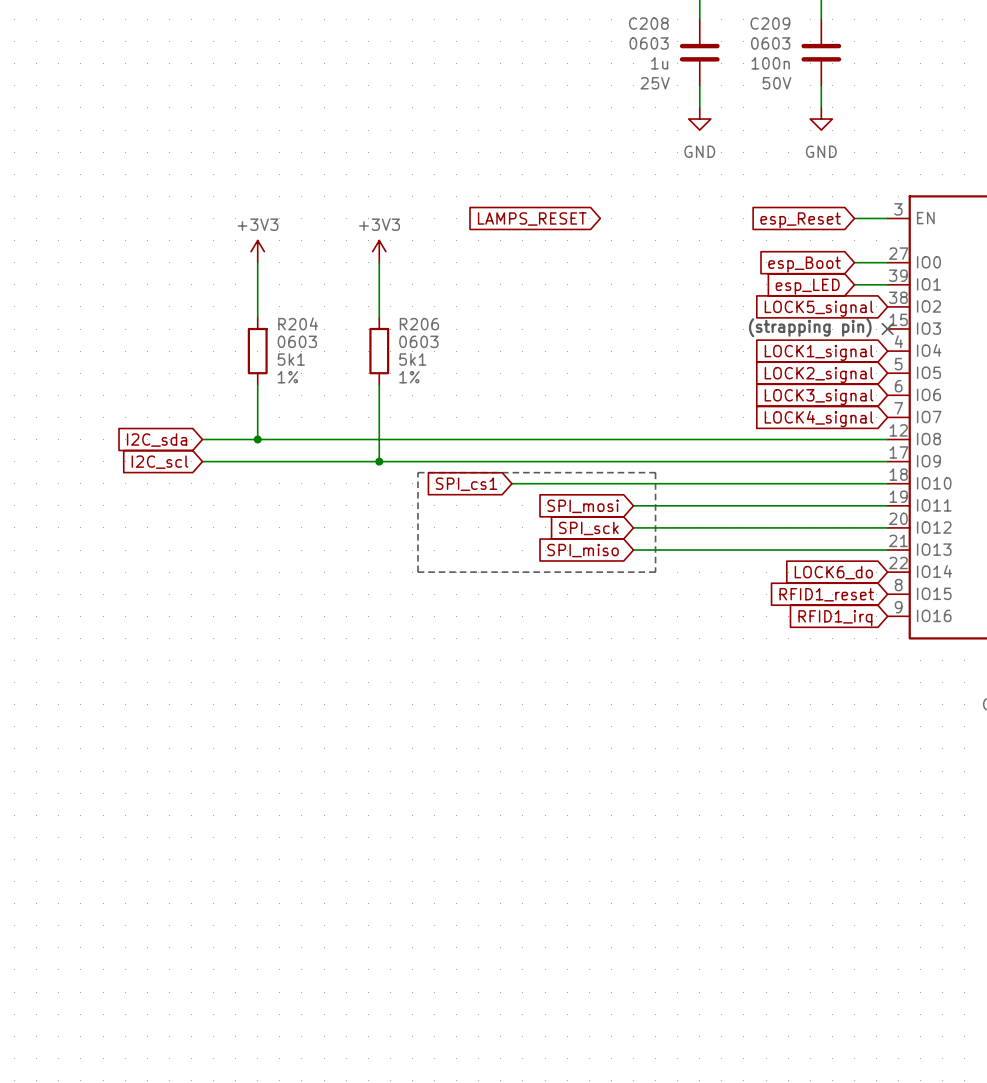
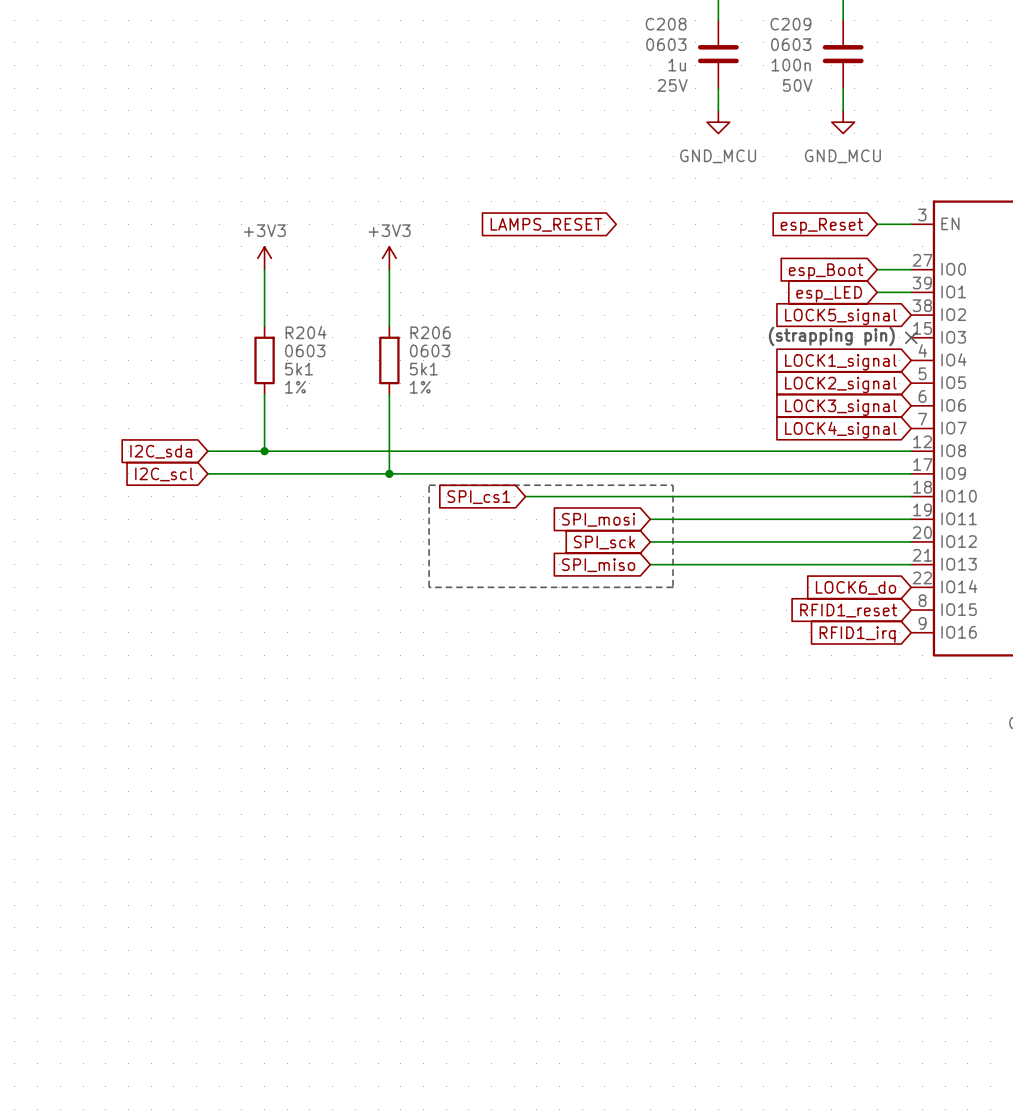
power symbol: GND (699, 119) -> GND_MCU (718, 122)
power symbol: GND (821, 119) -> GND_MCU (843, 122)

